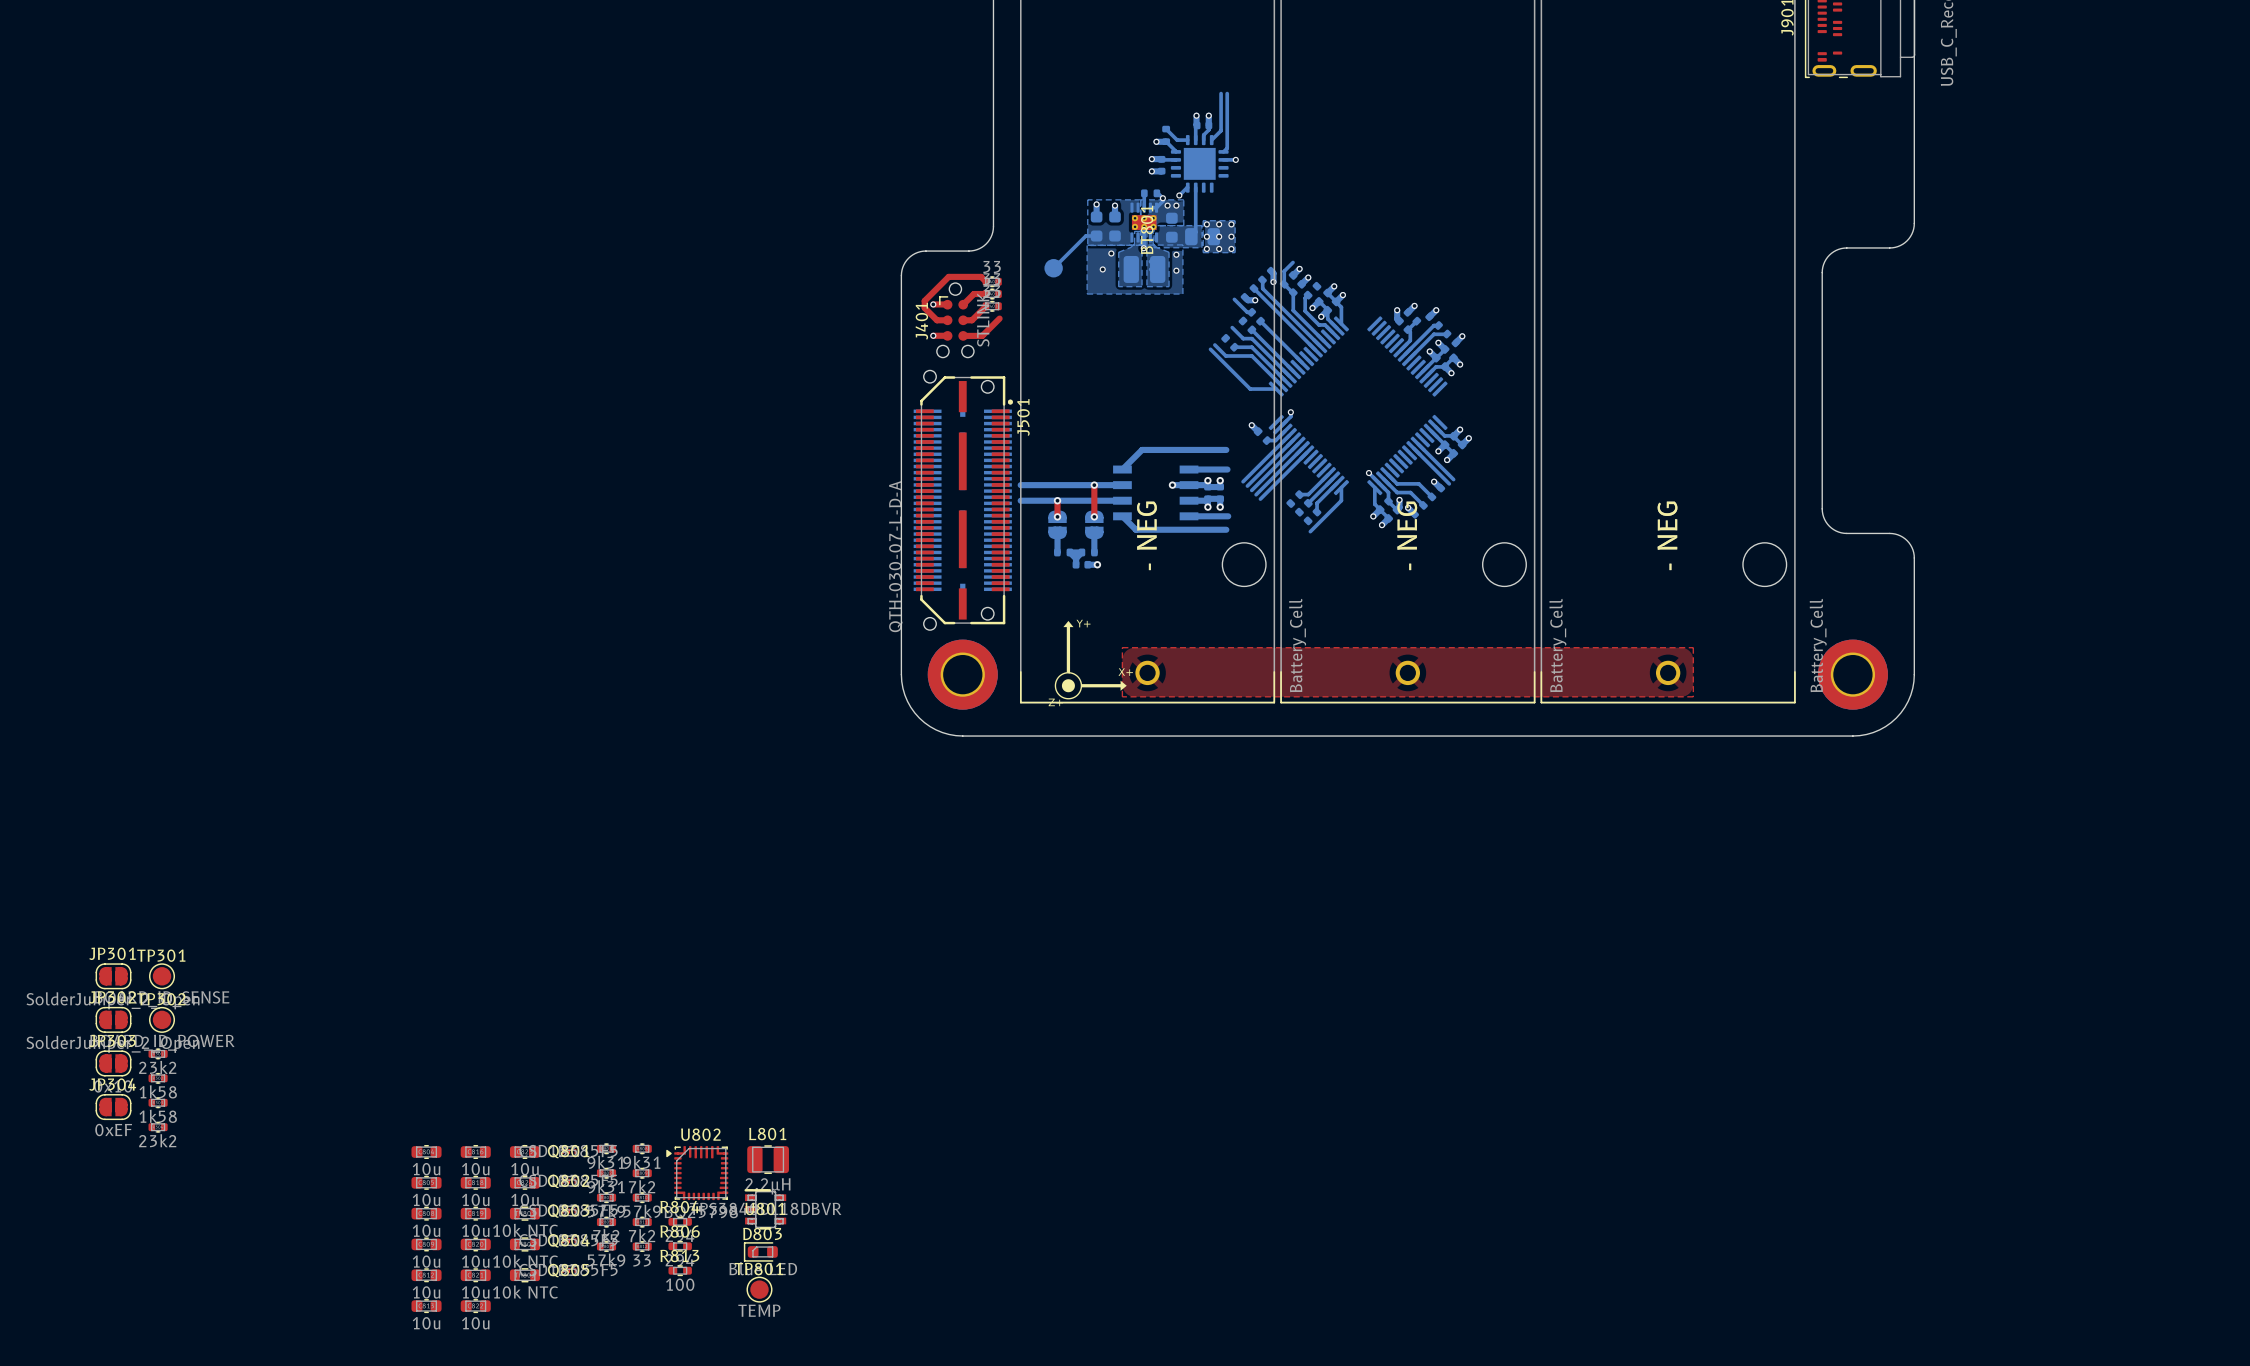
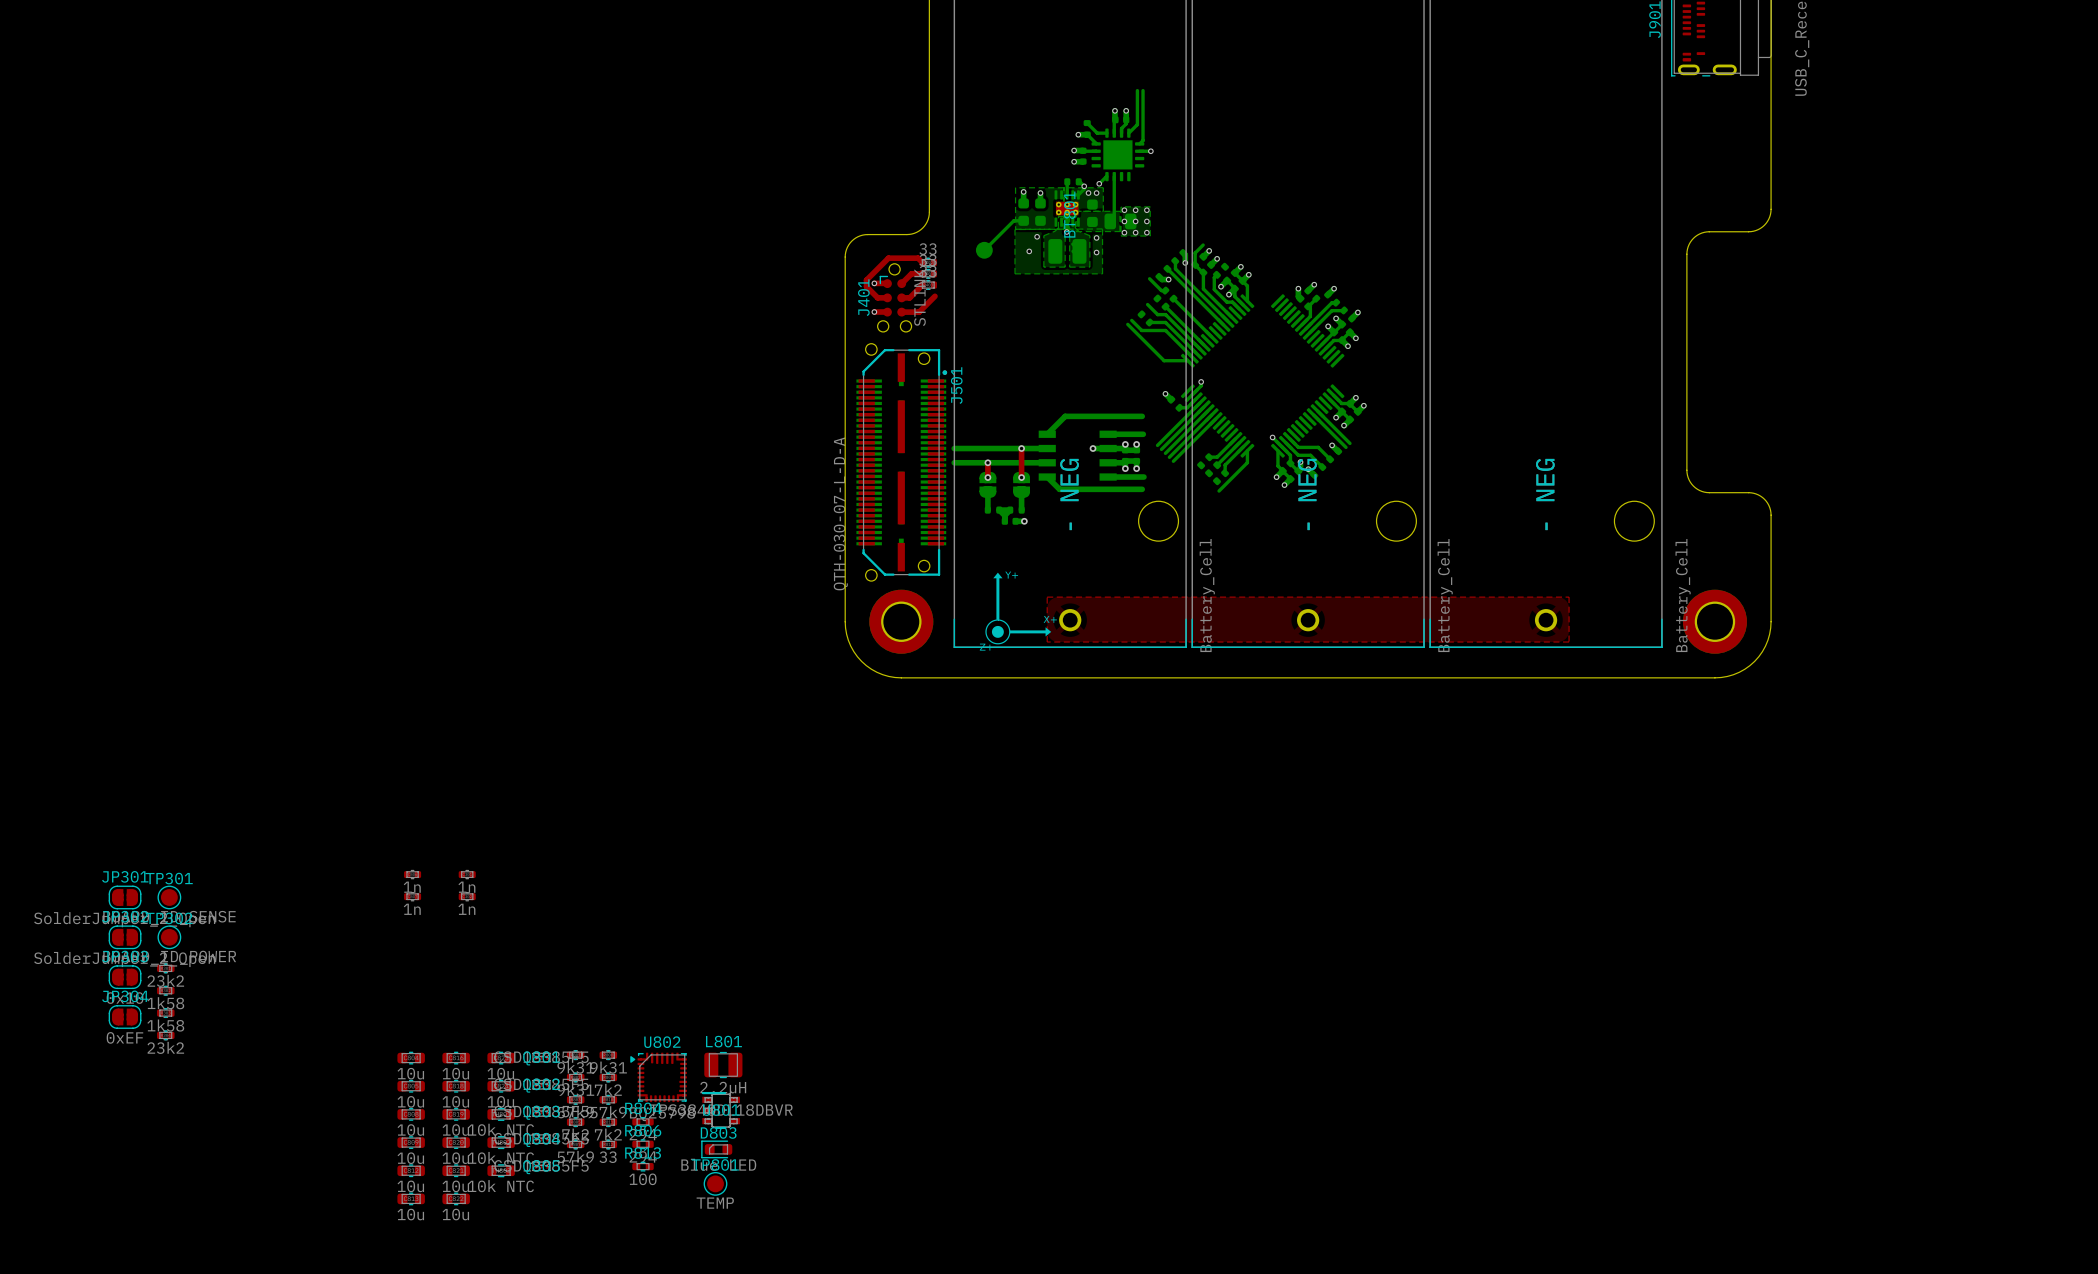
part: none -> 1n (412, 874)
part: none -> 1n (467, 874)
part: none -> 1n (412, 896)
part: none -> 1n (467, 896)

